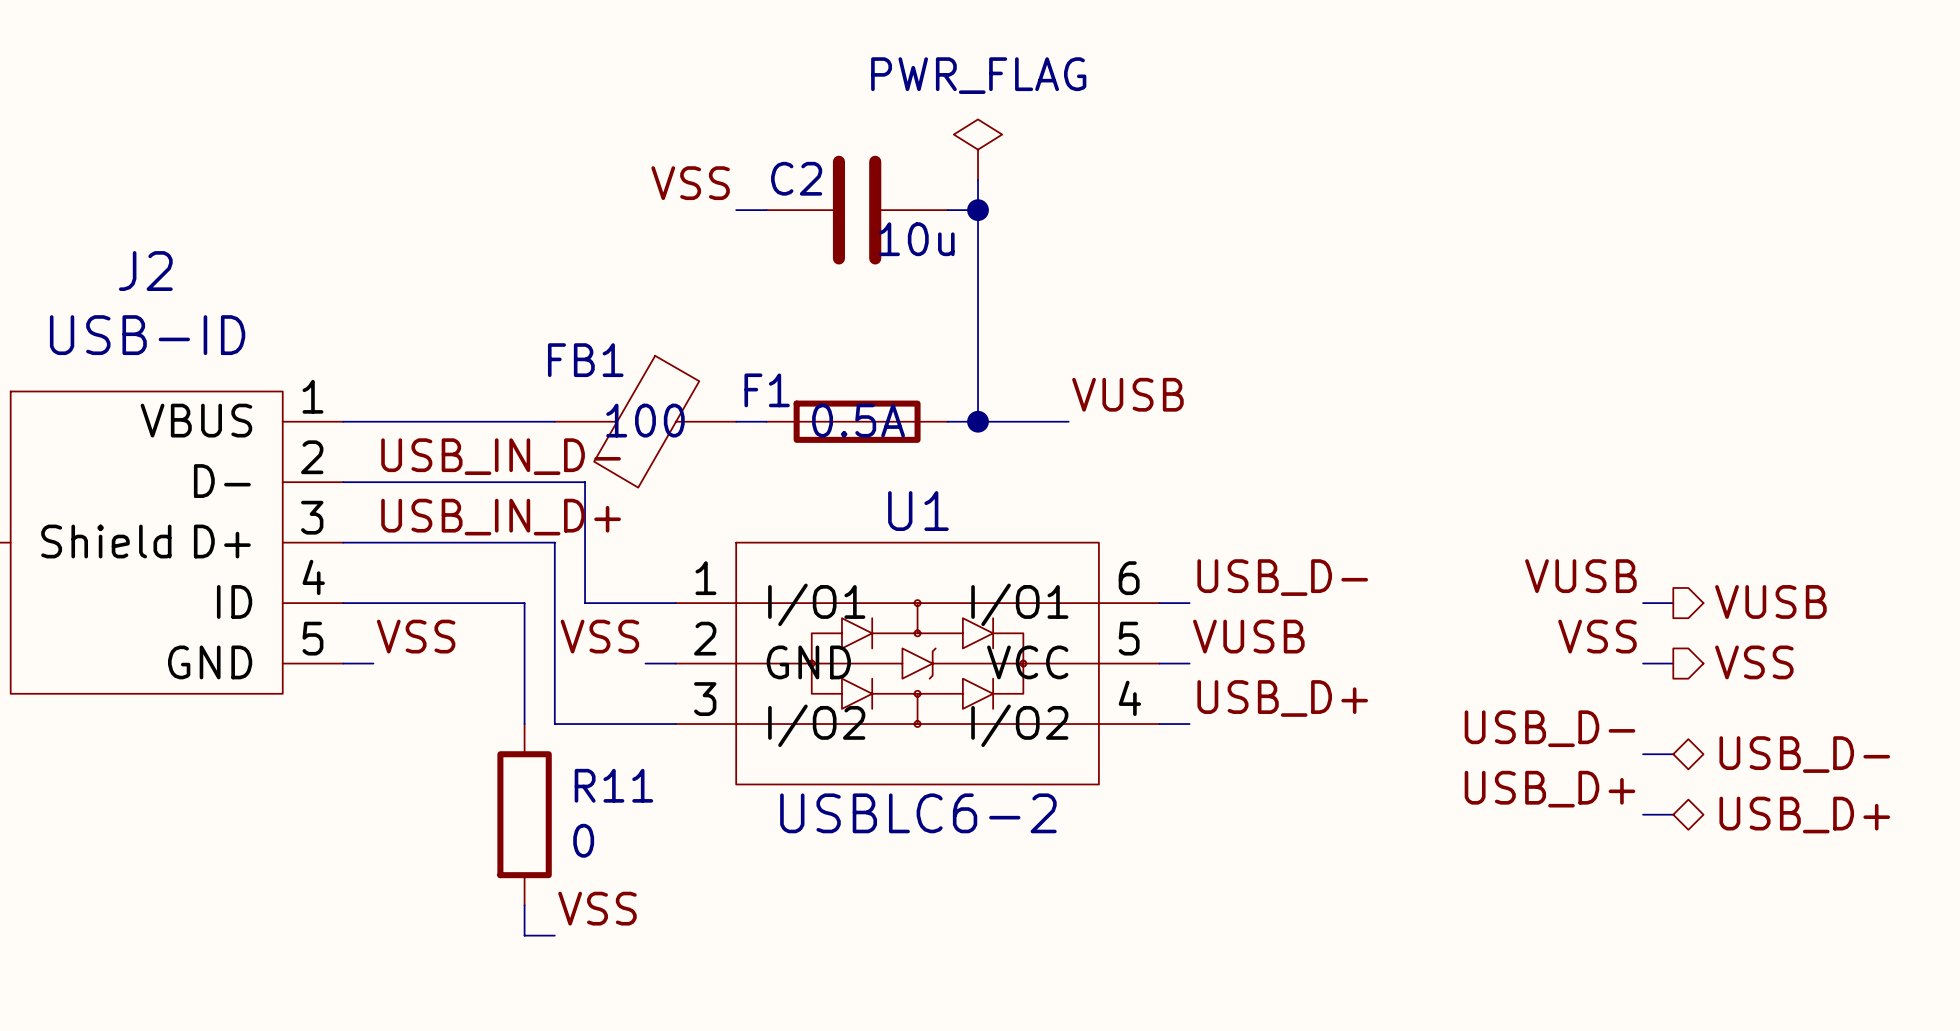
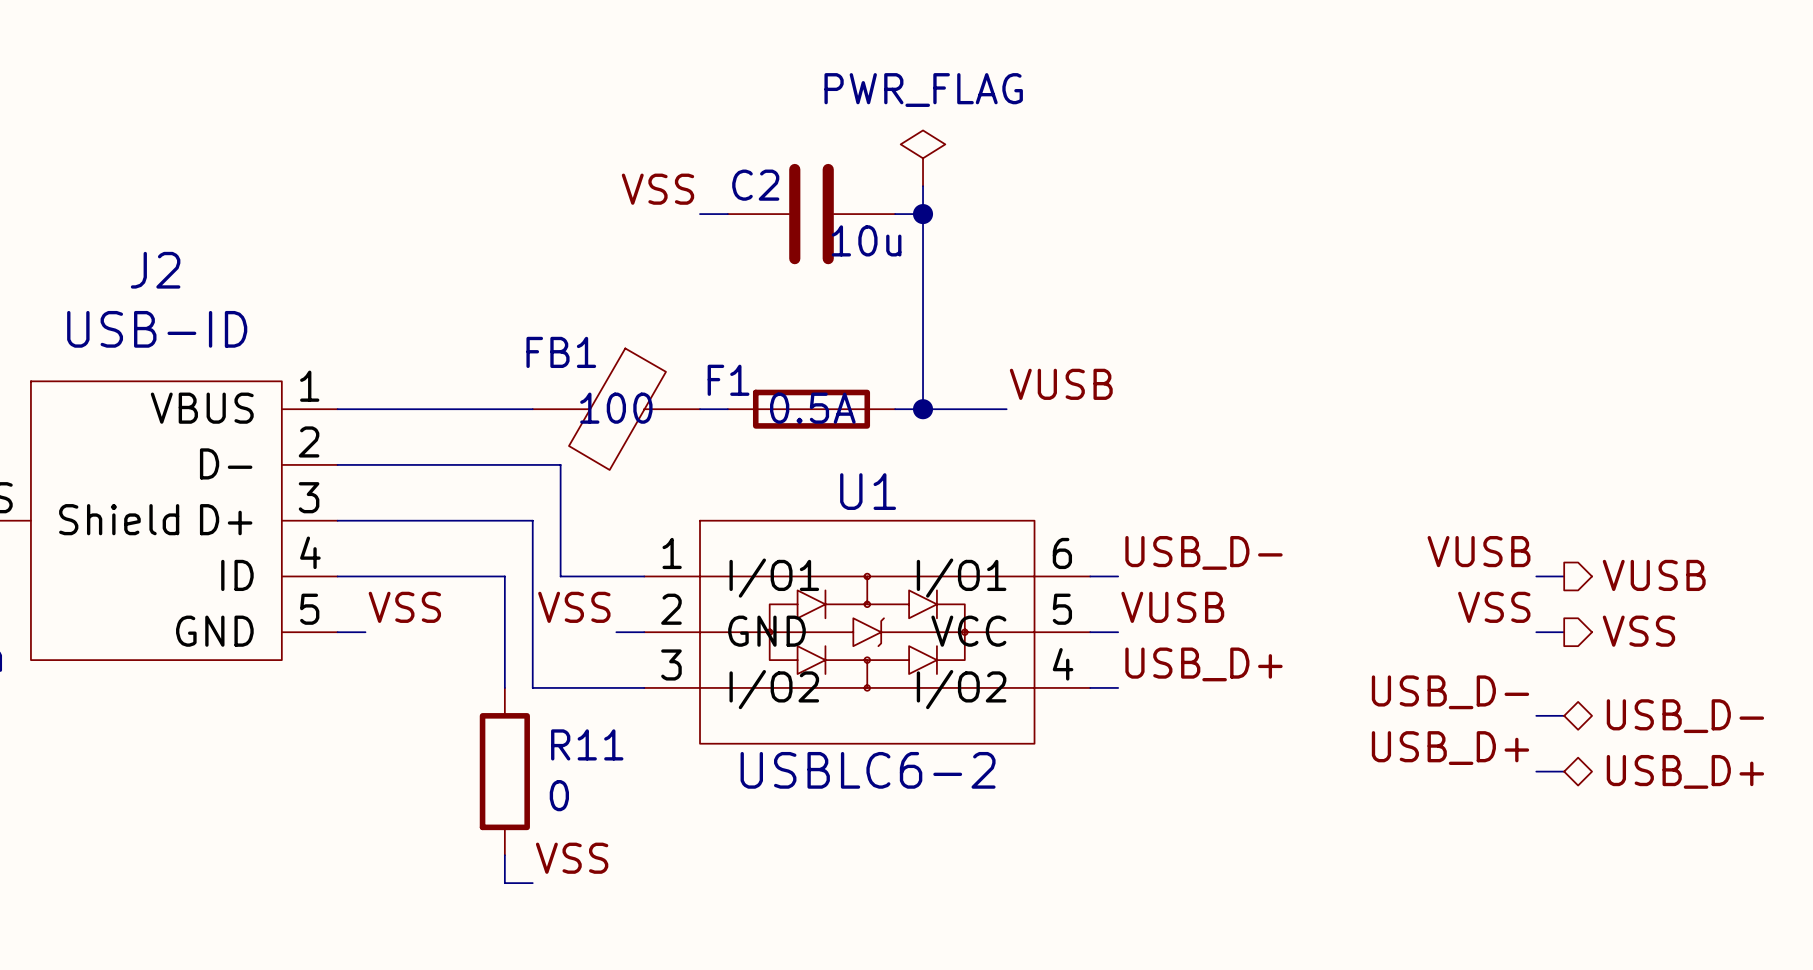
label: USB_IN_D- (501, 456) -> none
label: USB_IN_D+ (501, 517) -> none

